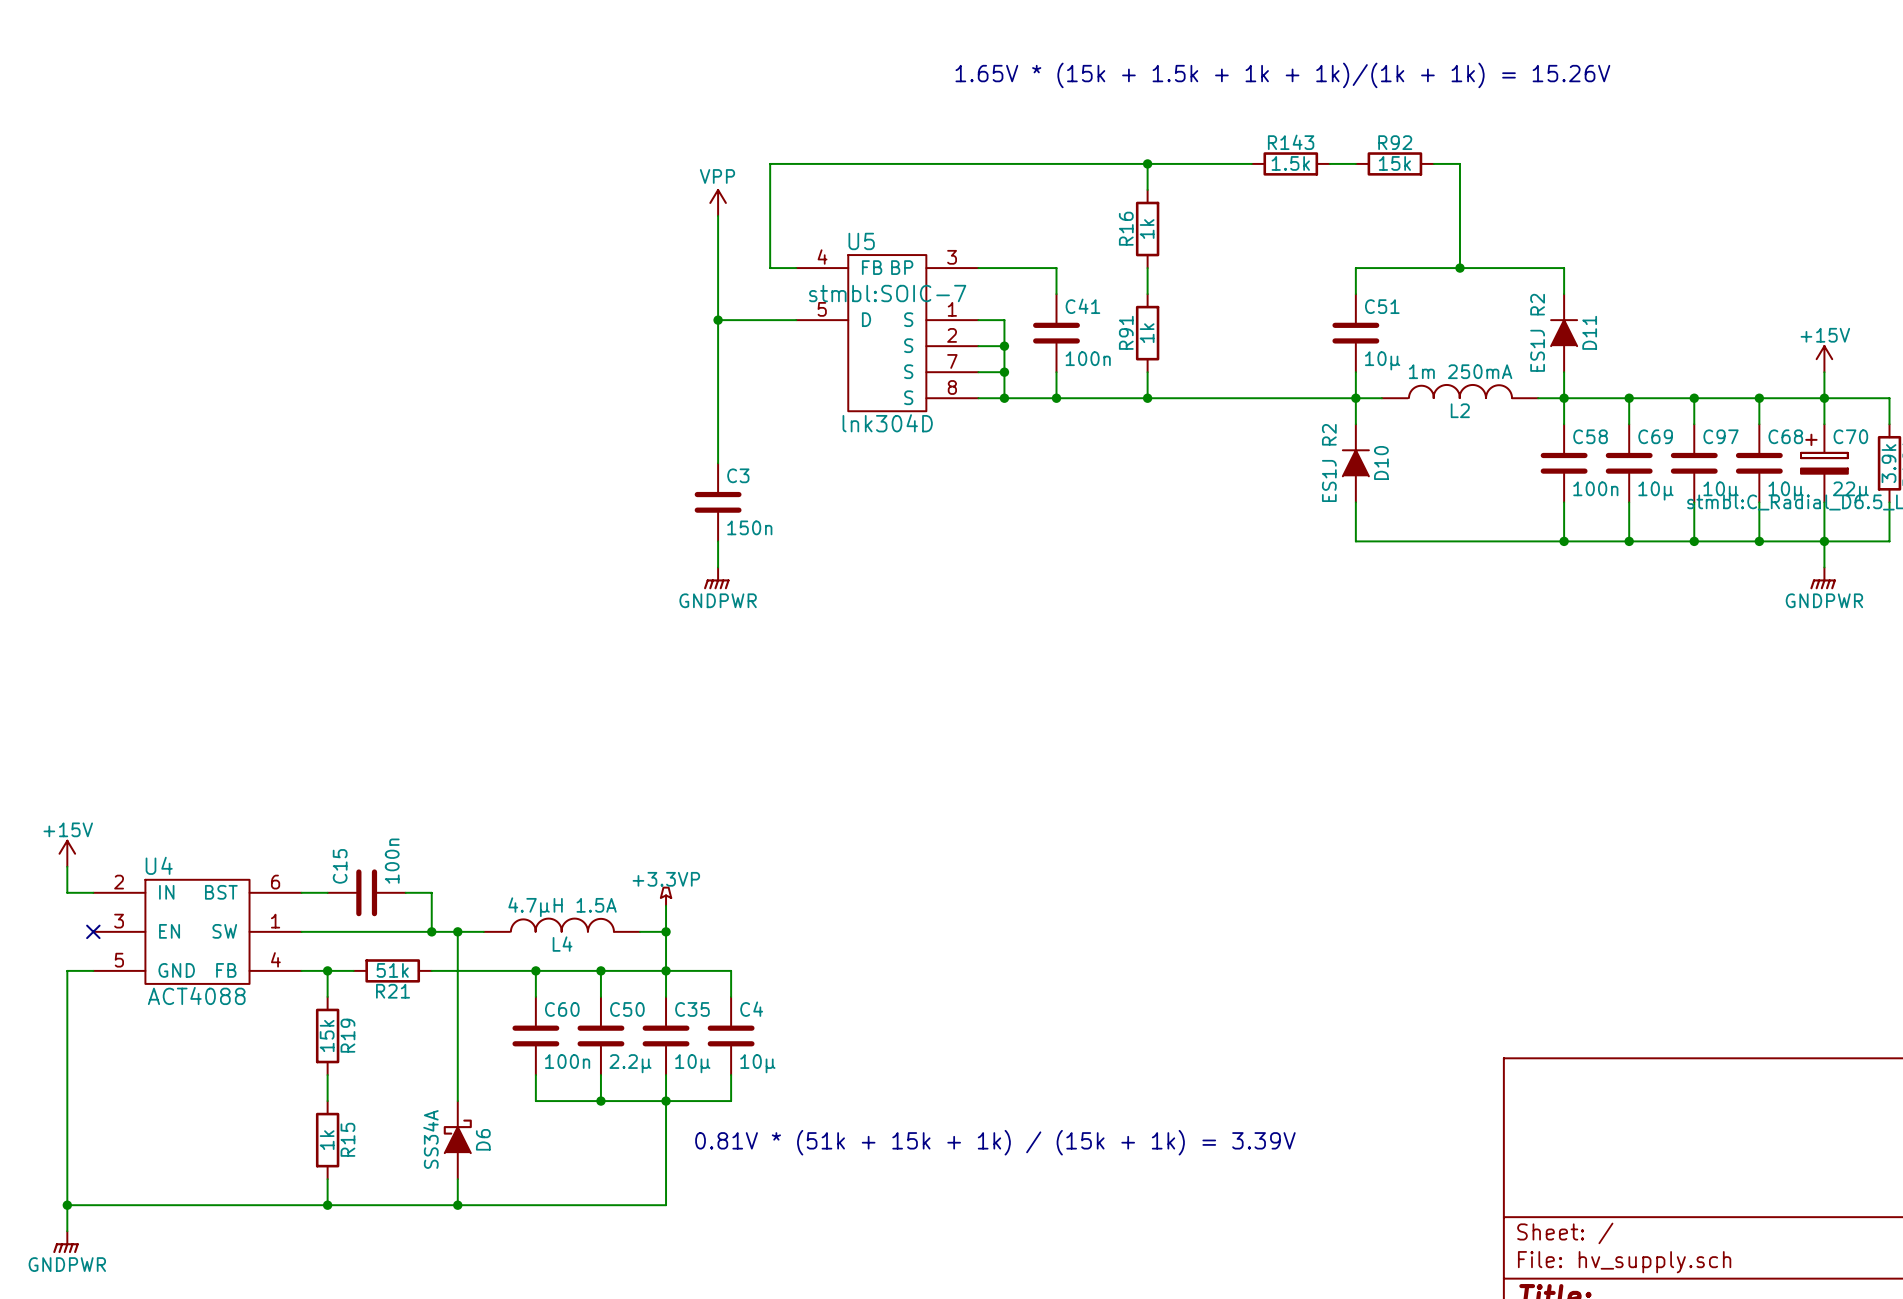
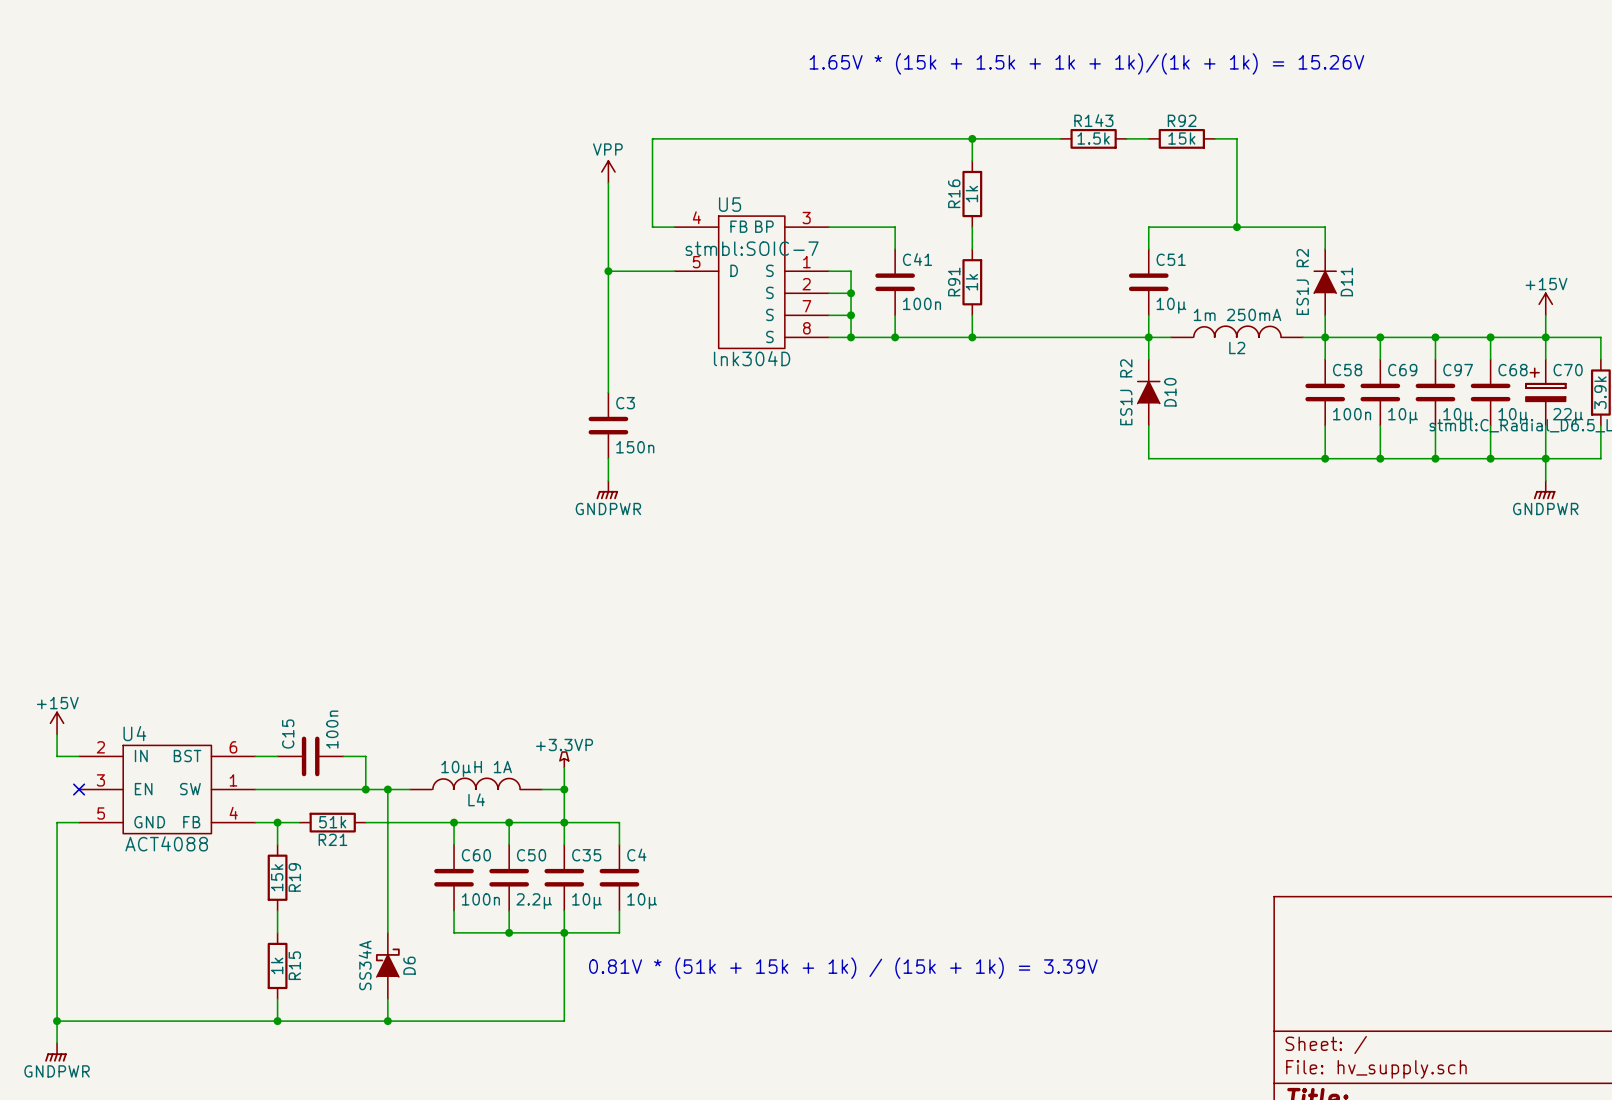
L4 value: 4.7µH 1.5A (562, 907) -> 10µH 1A (476, 768)

